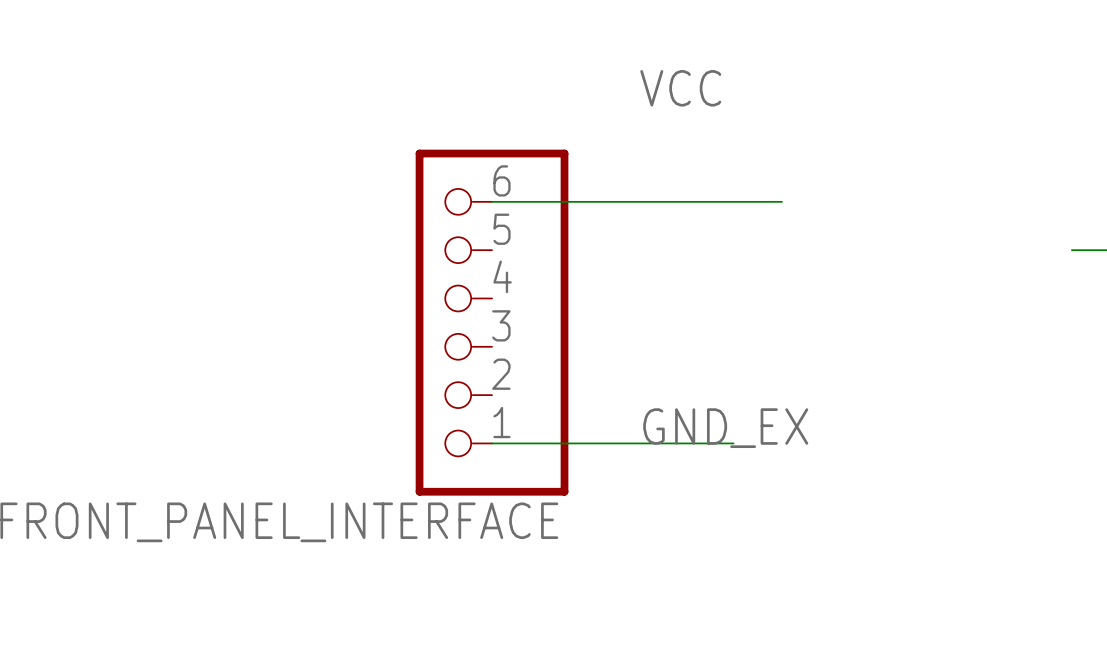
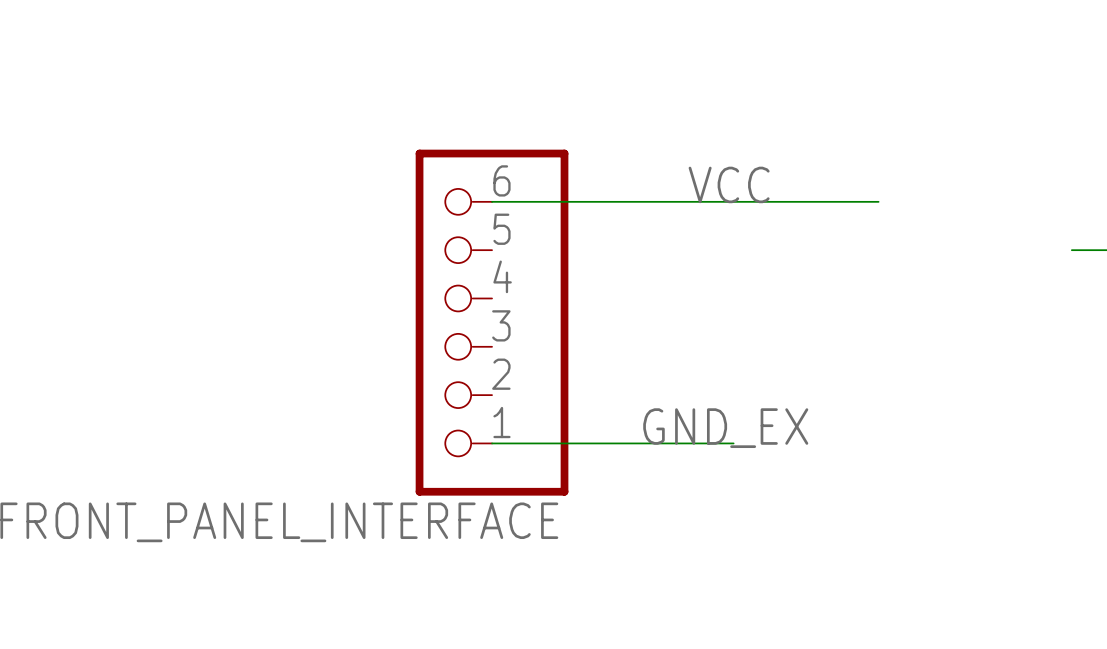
label position: VCC (680, 88) -> VCC (729, 184)
wire: none -> (781, 201) (878, 201)

